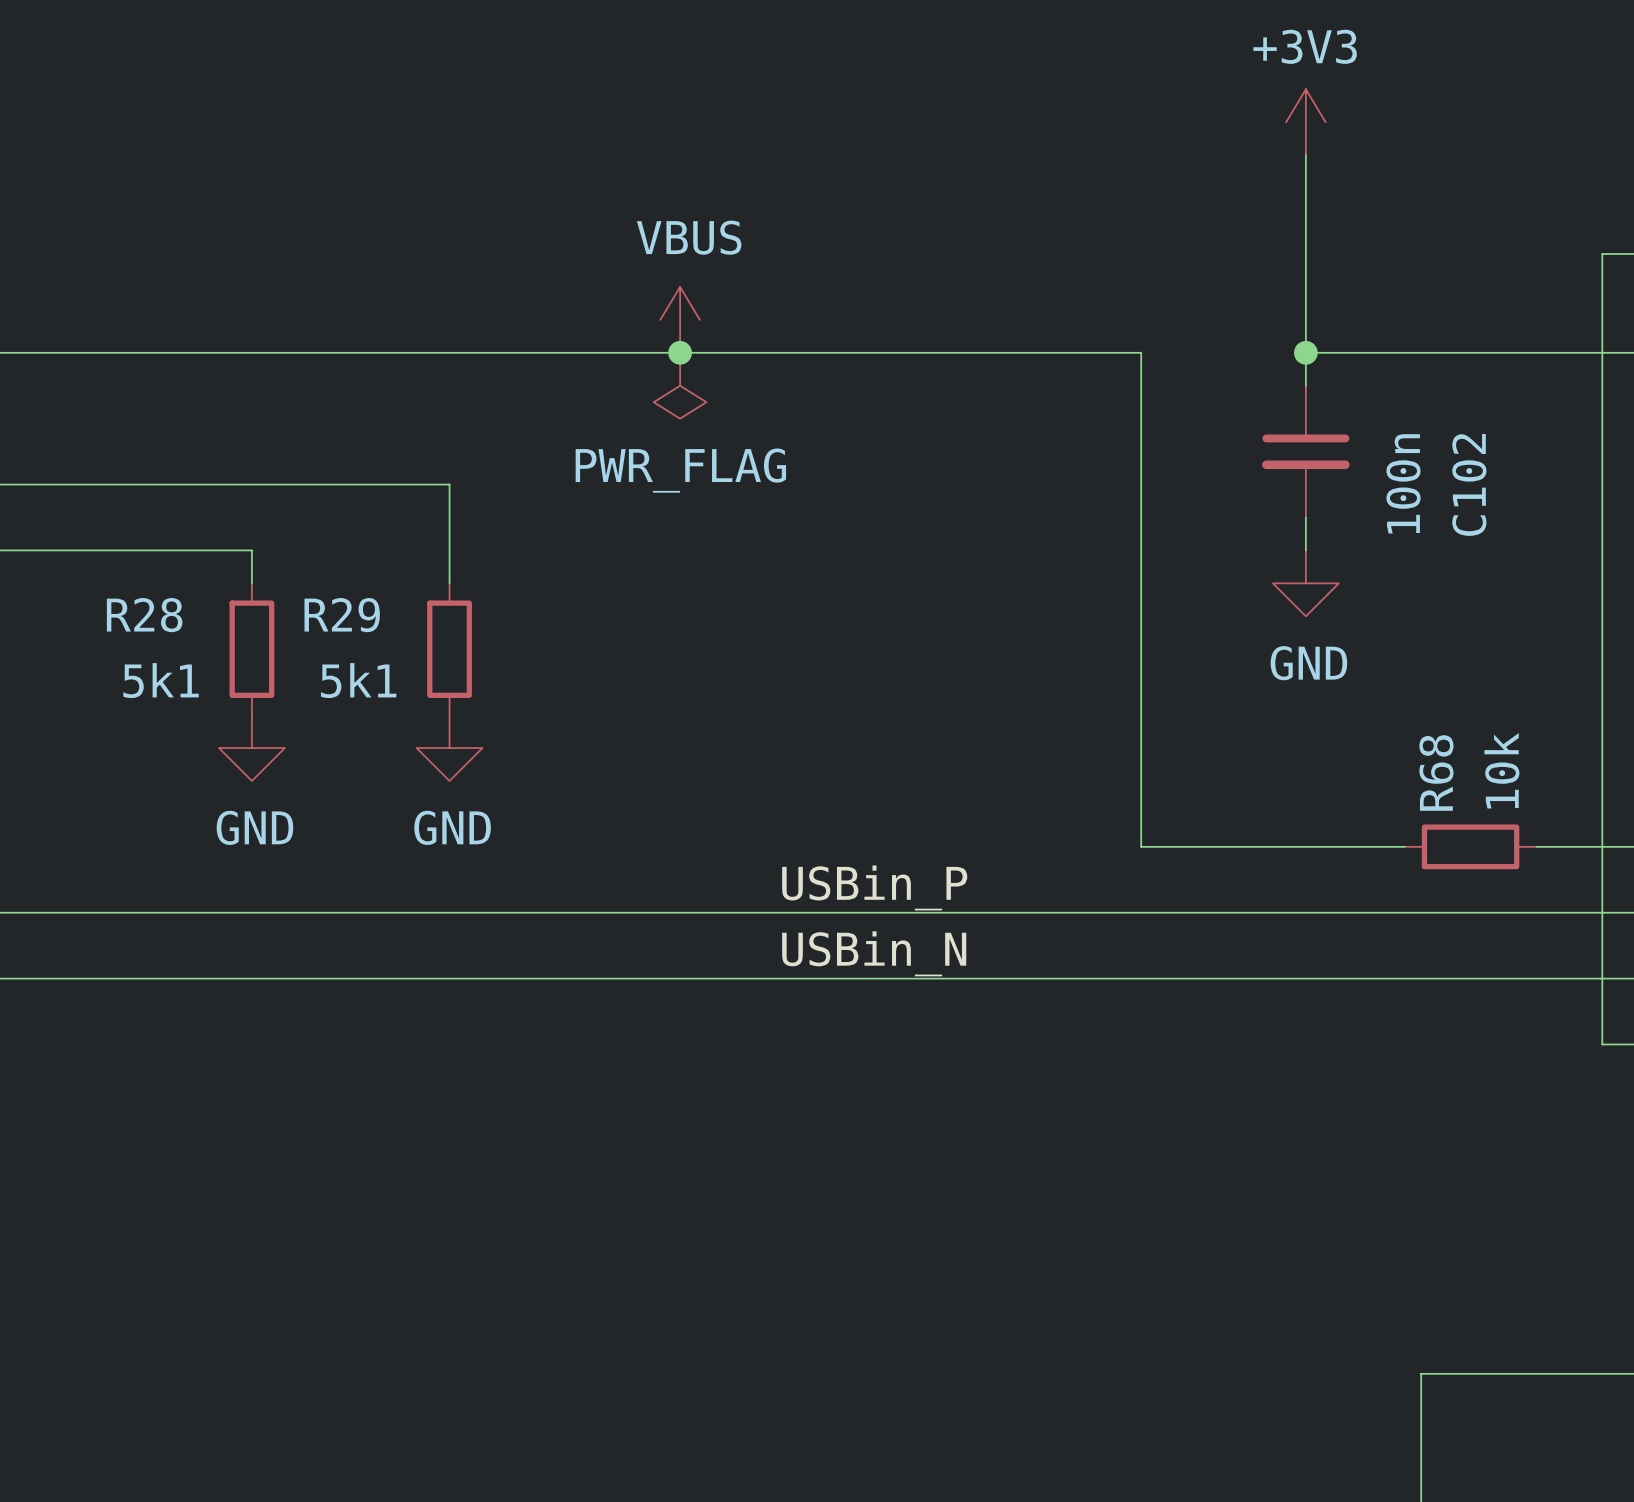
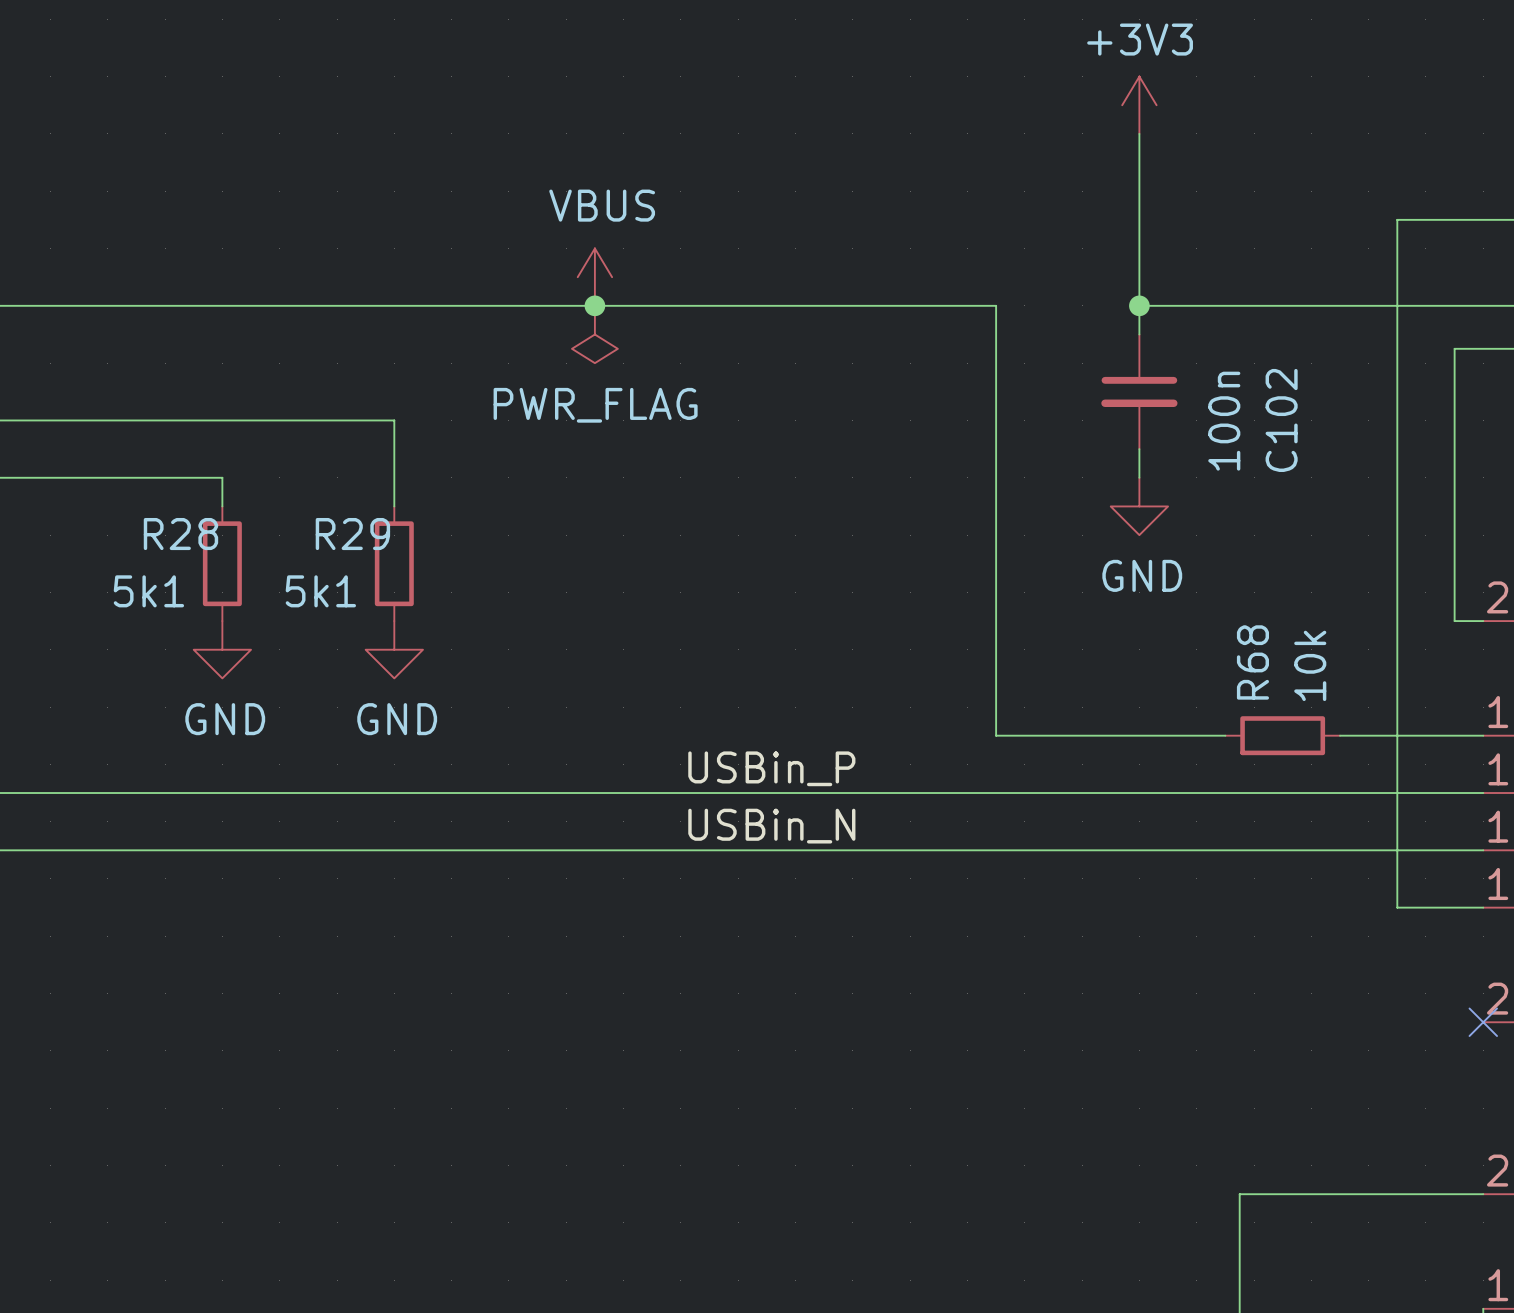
R28 name position: R28 (144, 615) -> R28 (180, 534)
R29 name position: R29 (342, 615) -> R29 (352, 534)

